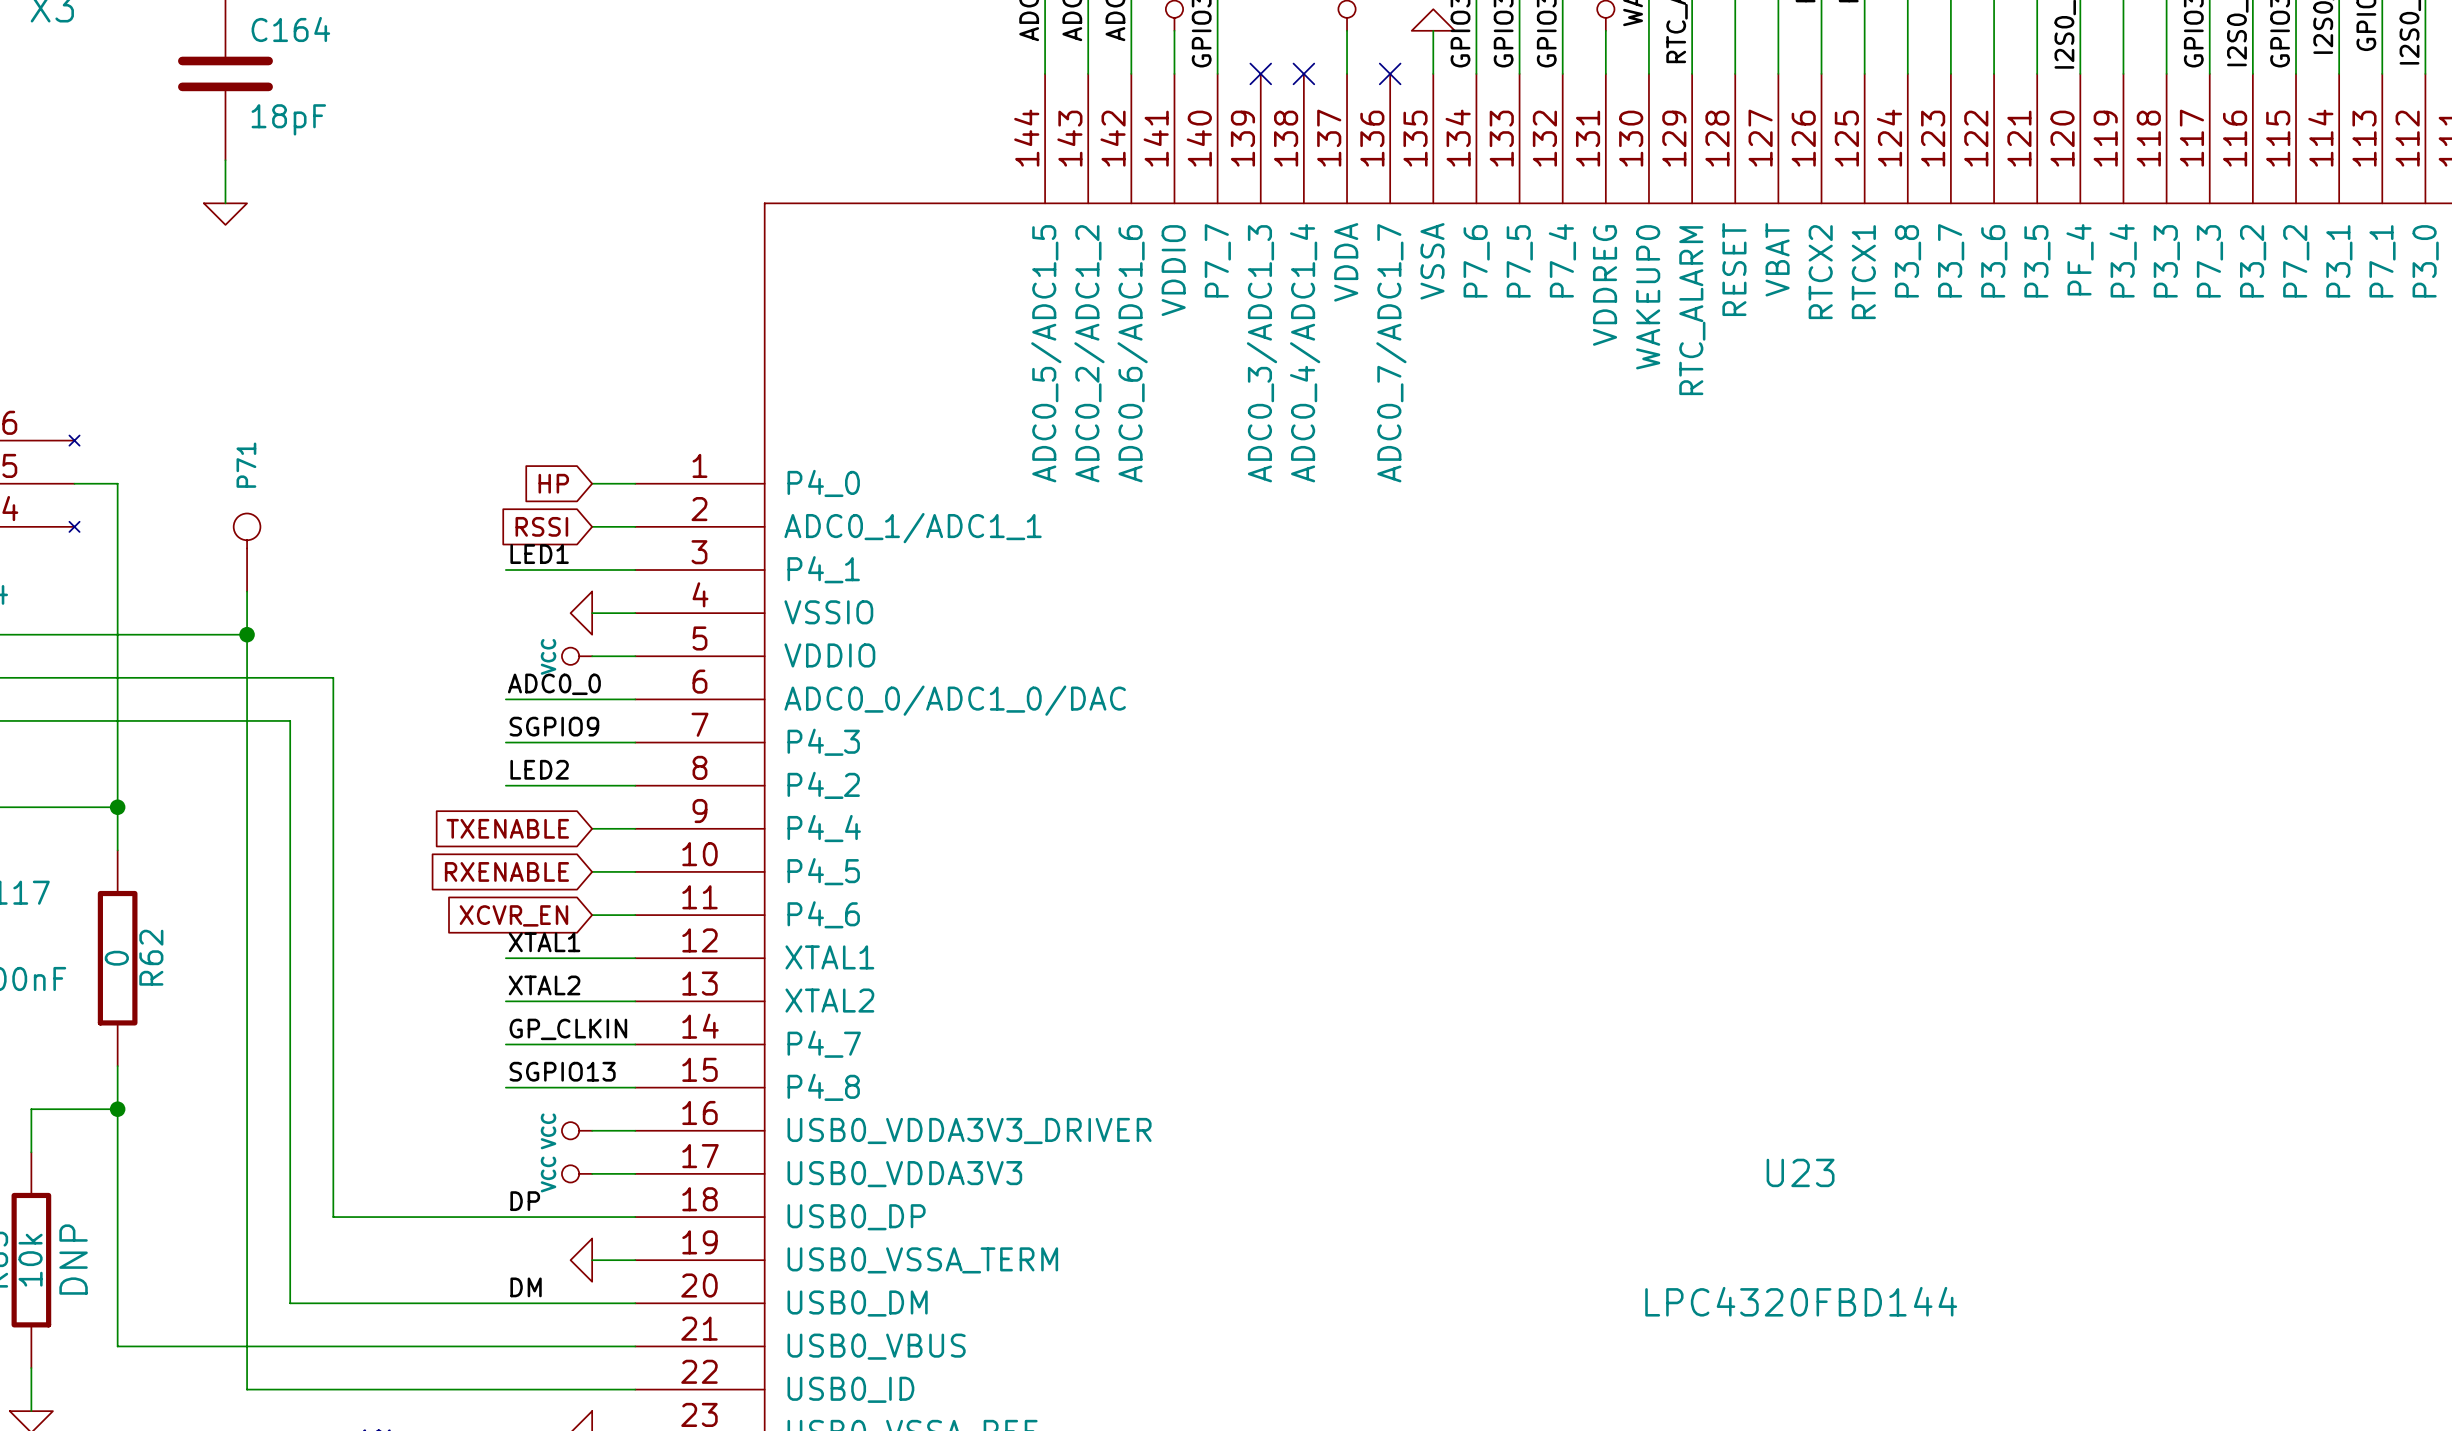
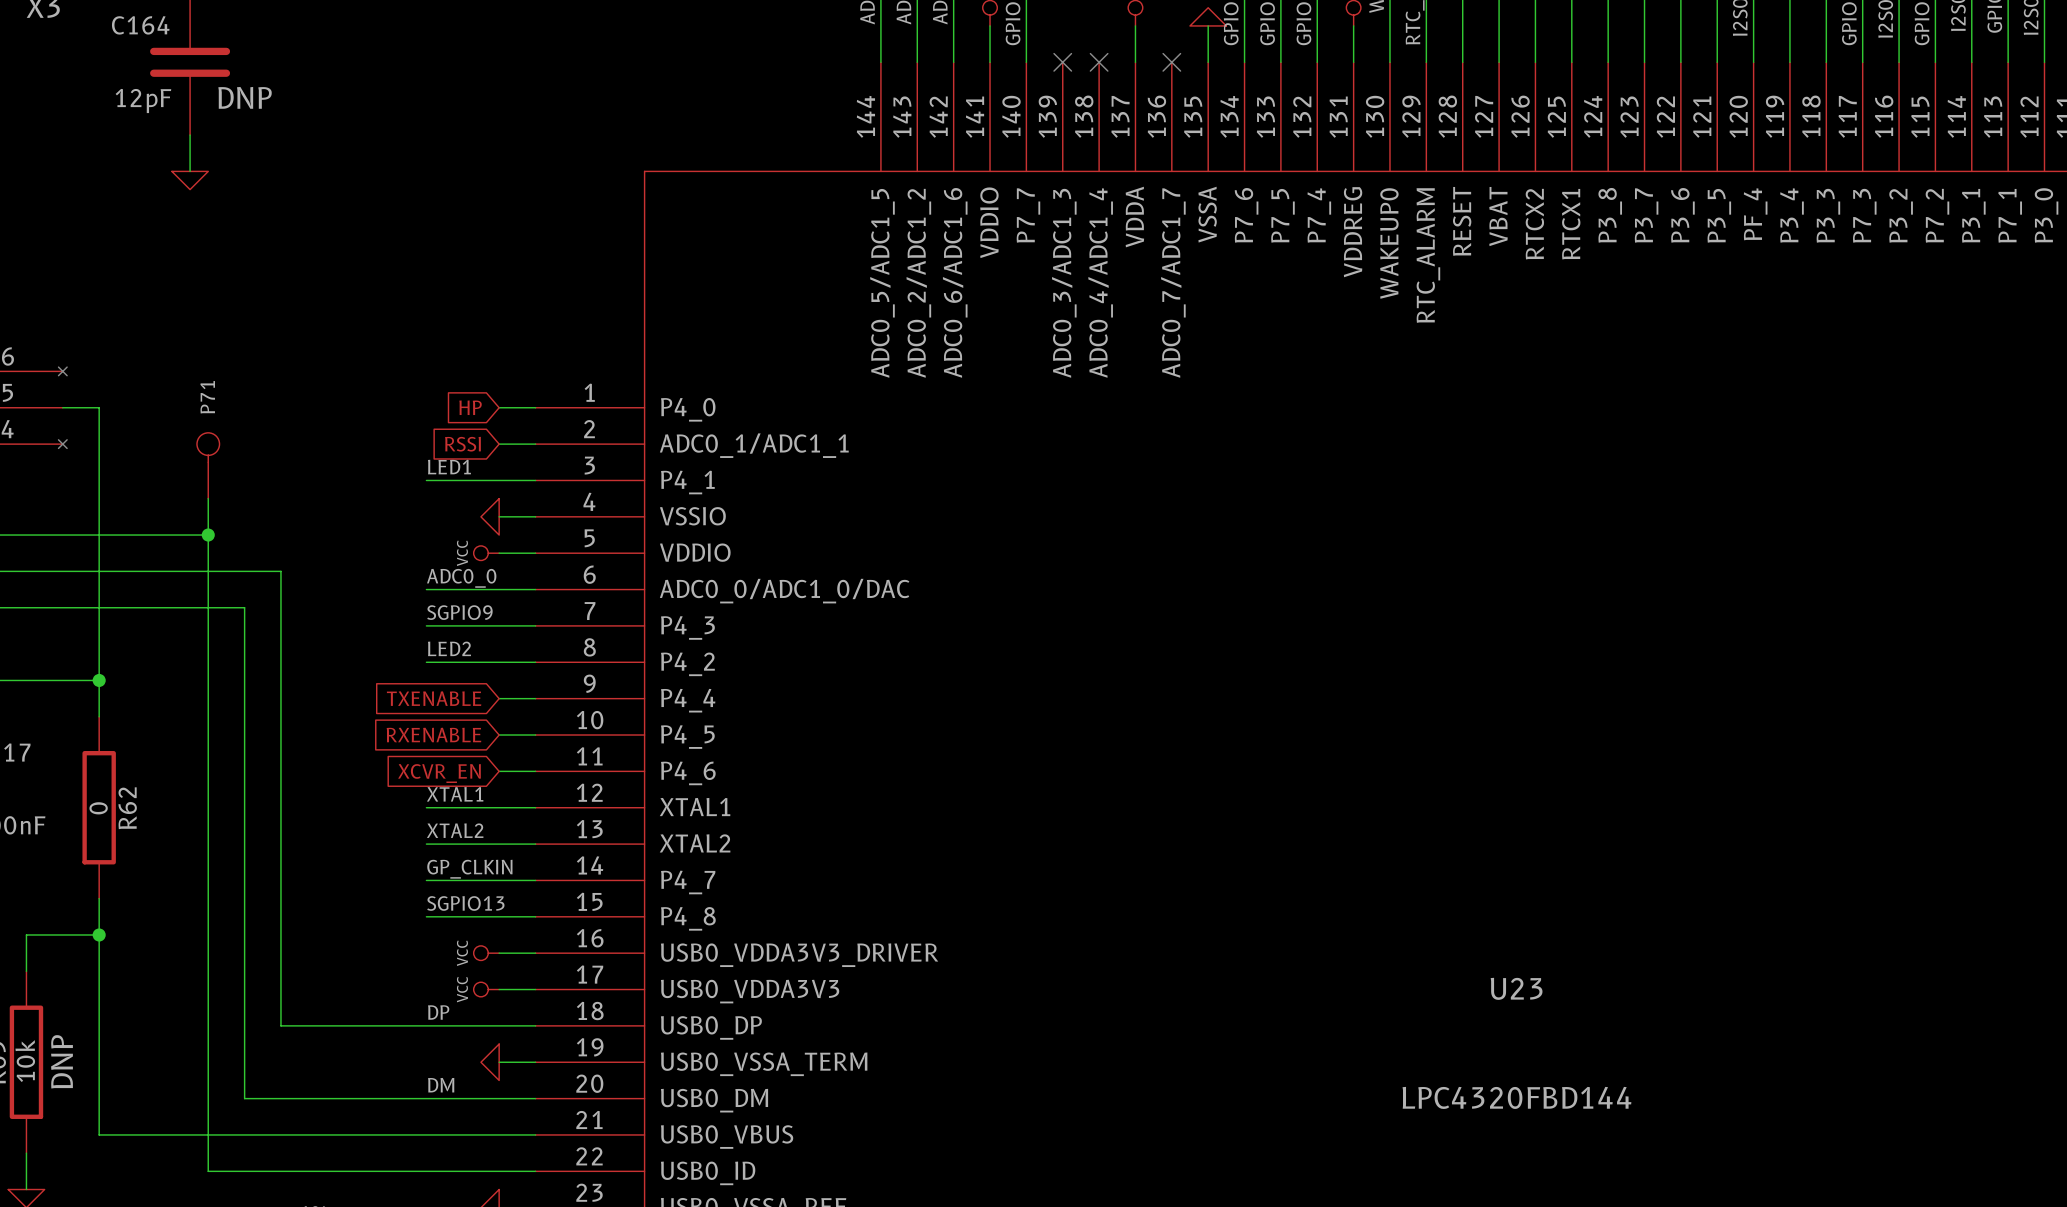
C164 name position: C164 (290, 29) -> C164 (140, 25)
C164 text: none -> DNP (245, 97)
C164 value: 18pF (288, 119) -> 12pF (143, 100)

